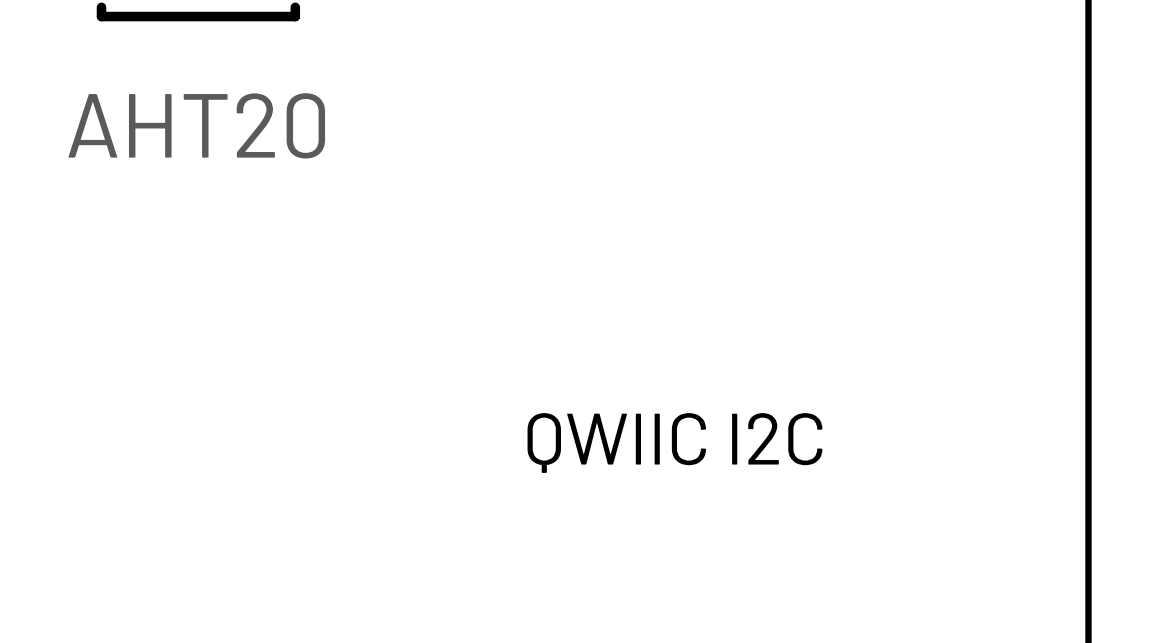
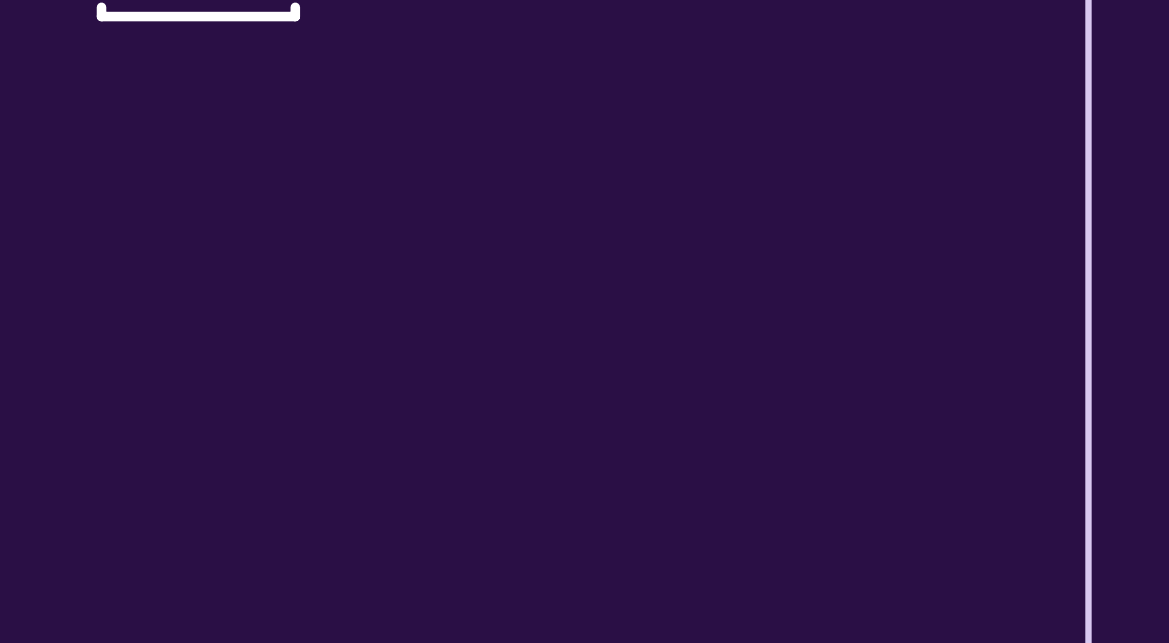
part value: AHT20 (196, 125) -> none
text: QWIIC I2C (674, 442) -> none

